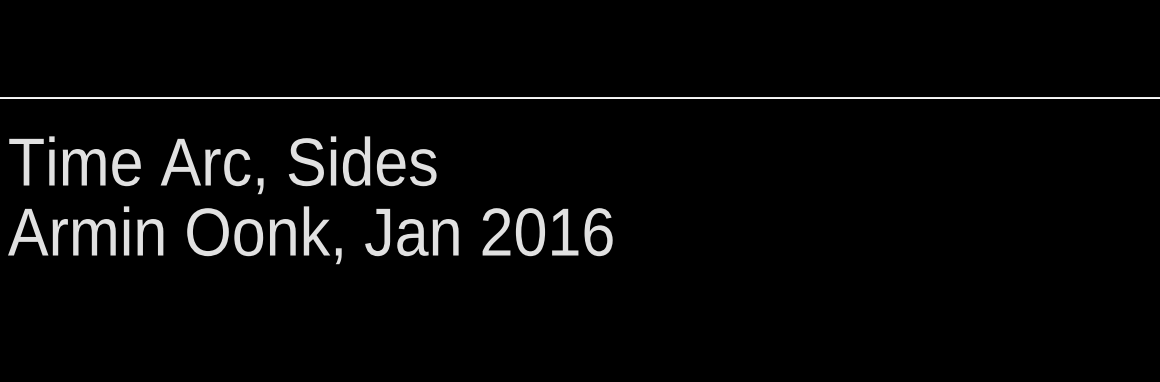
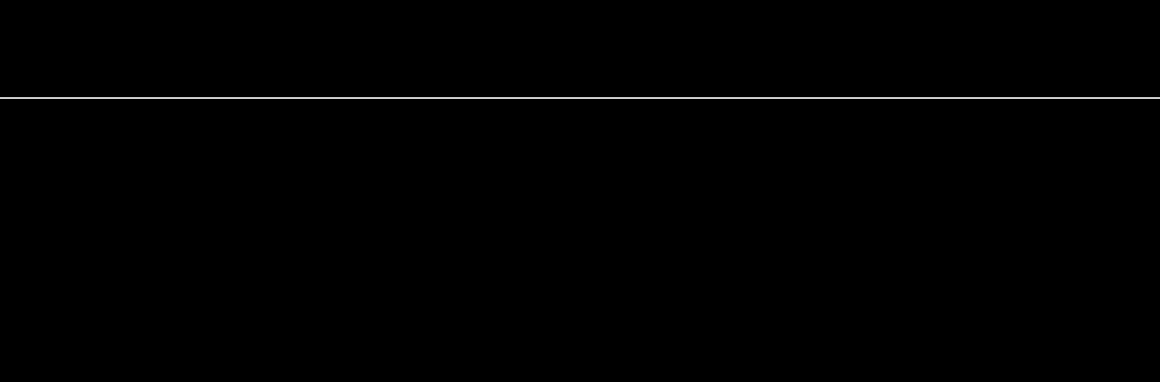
text: Time Arc, Sides (222, 165) -> none
text: Armin Oonk, Jan 2016 (310, 235) -> none

